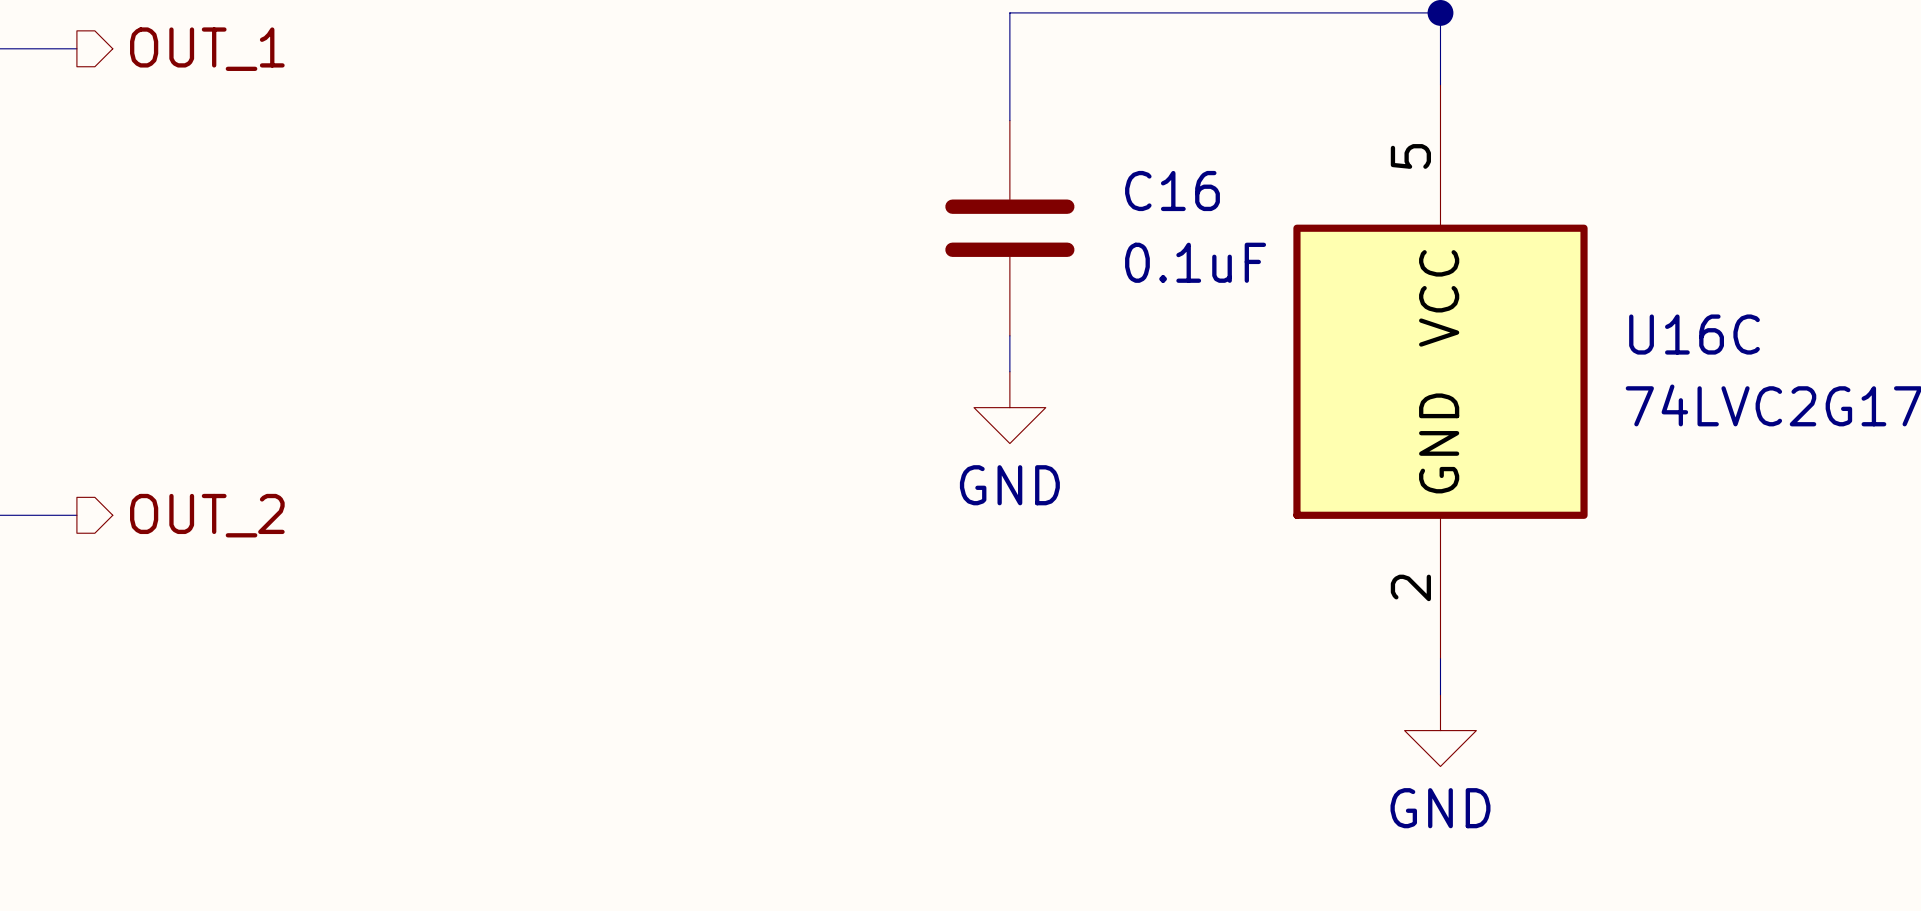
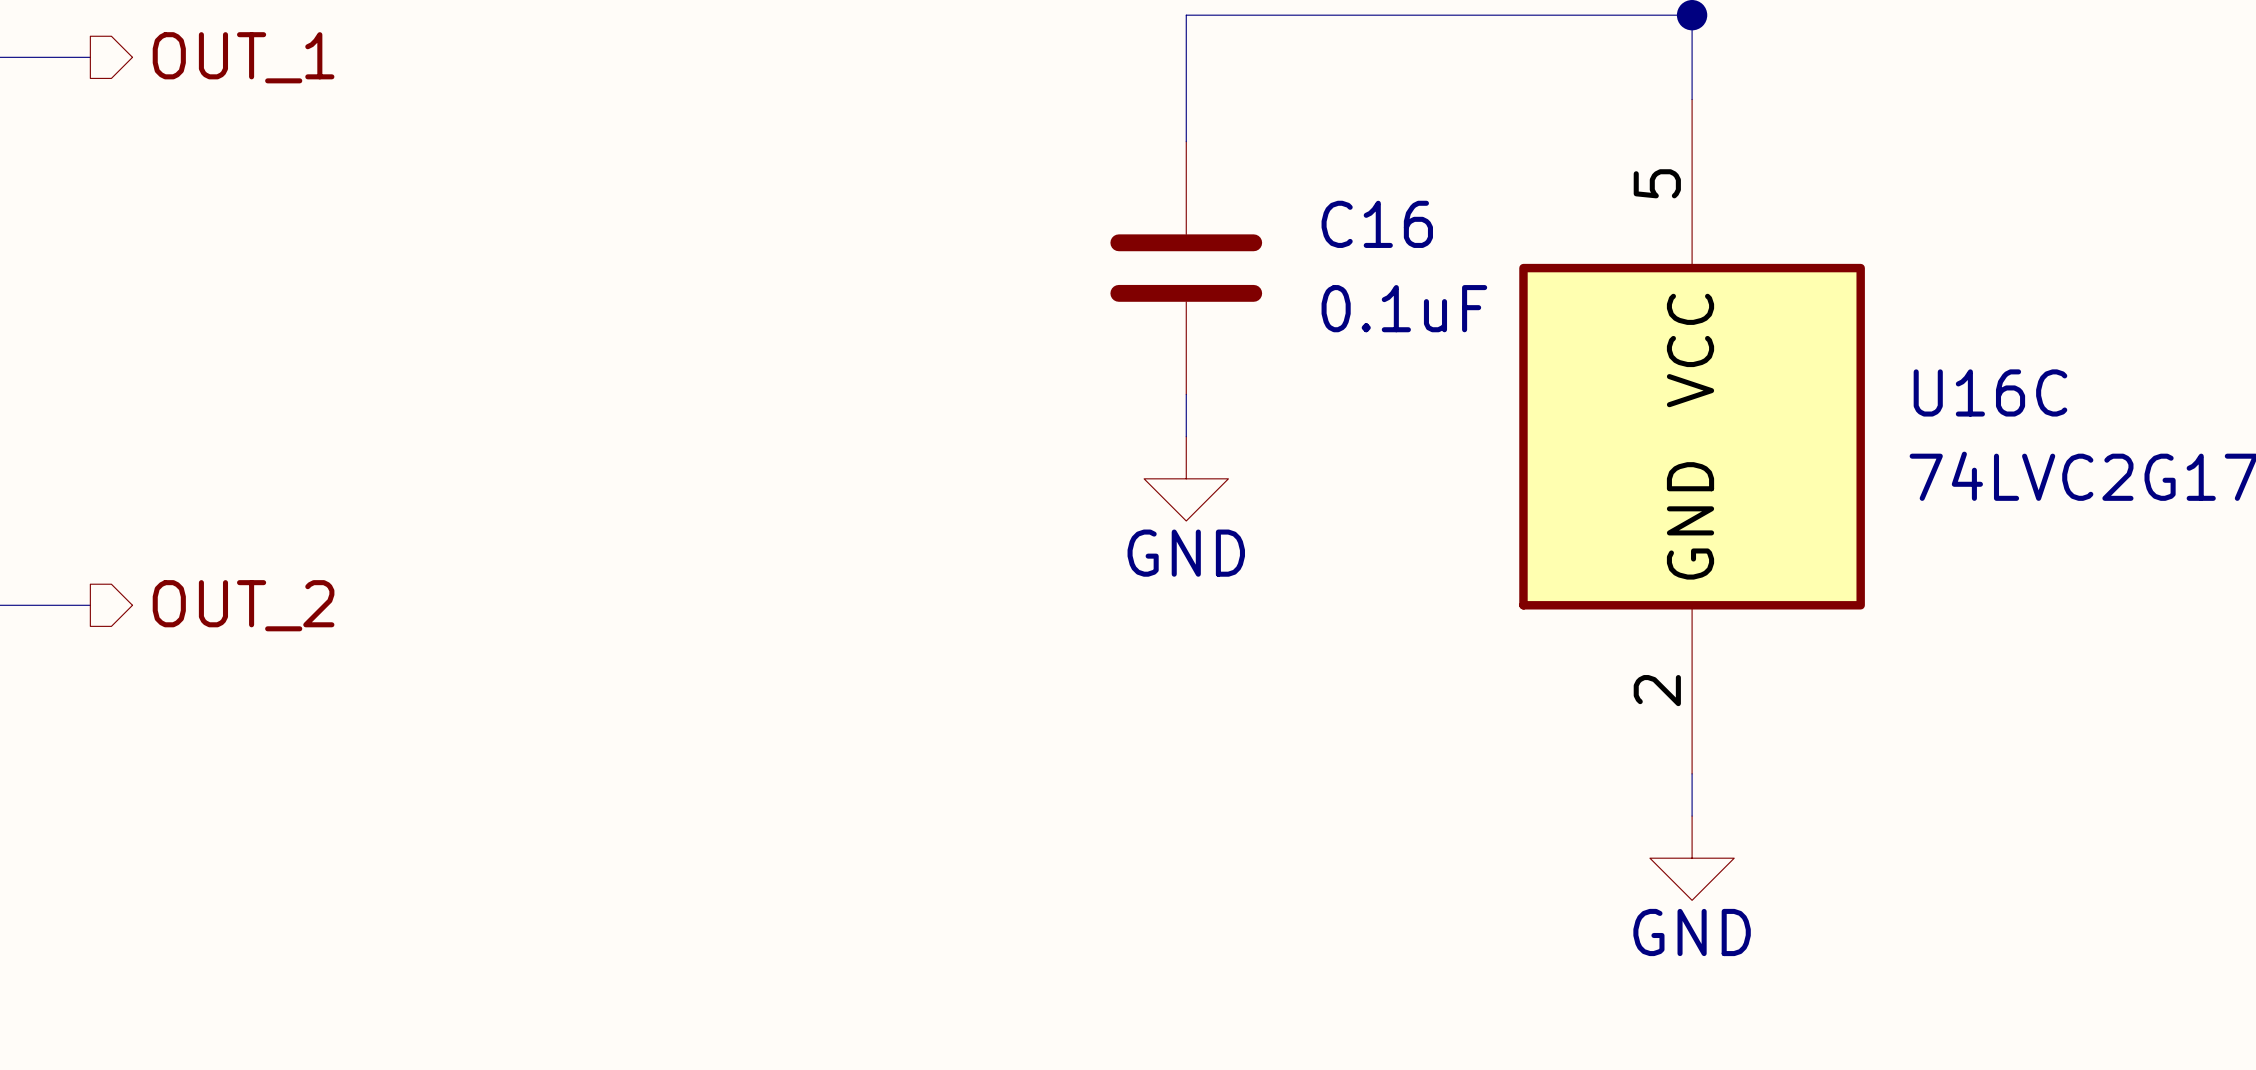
power symbol text position: GND (1009, 485) -> GND (1186, 553)
power symbol text position: GND (1440, 808) -> GND (1692, 932)

